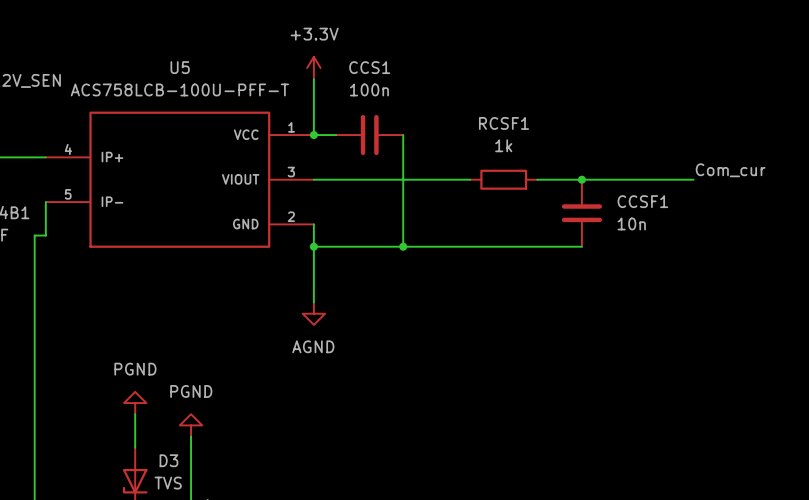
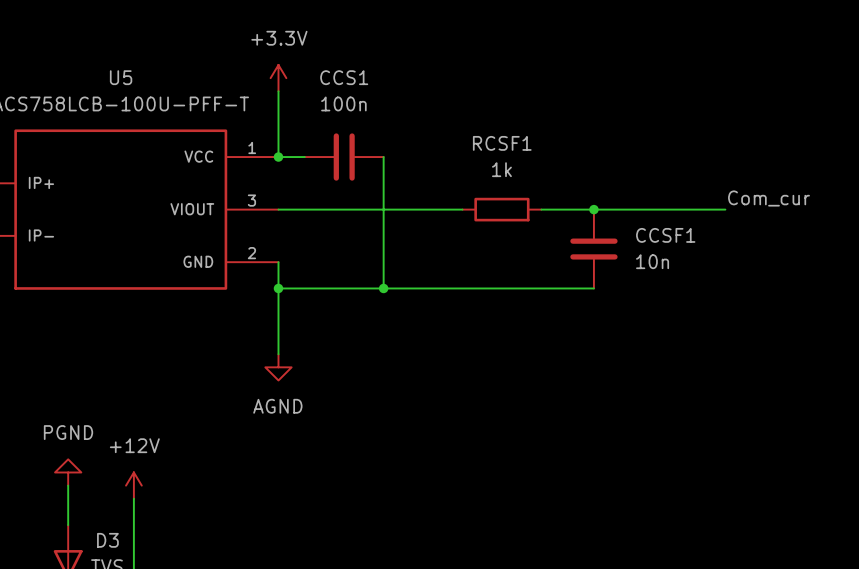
power symbol: none -> +12V (133, 485)
power symbol: PGND (191, 425) -> none

